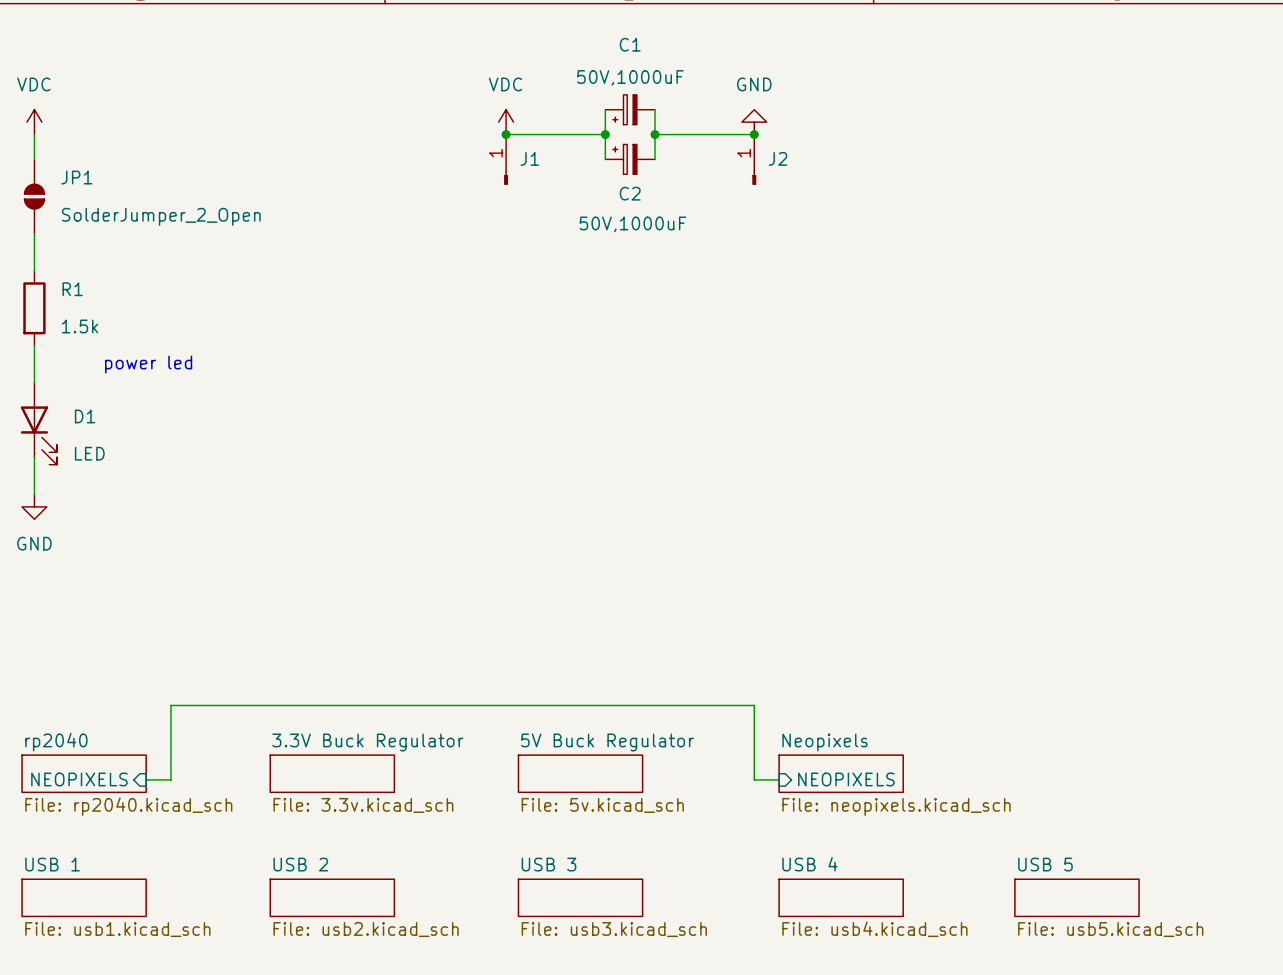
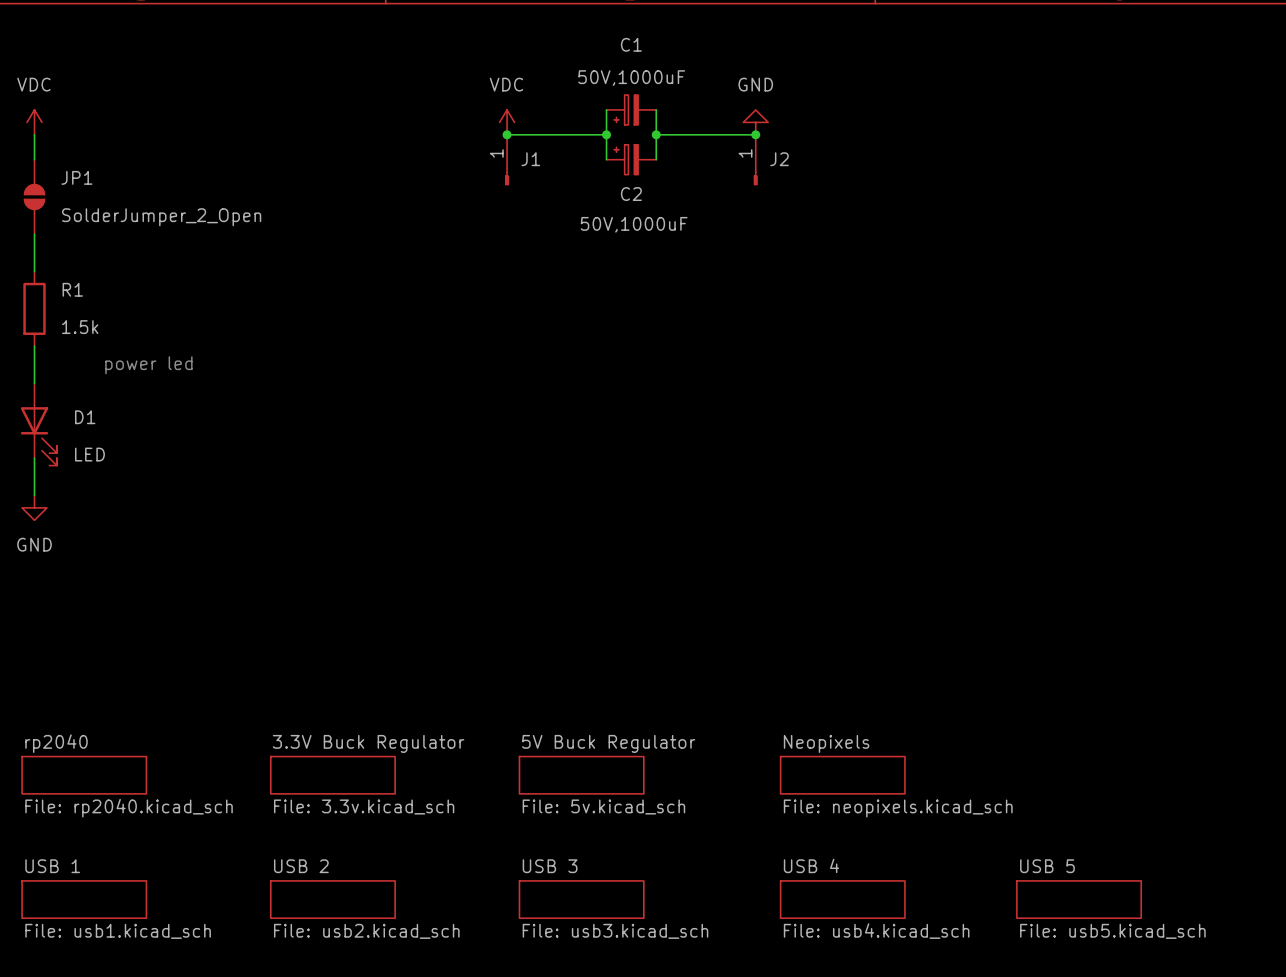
sheet pin: NEOPIXELS (79, 779) -> none
wire: (146, 779) (170, 779) (170, 705) (754, 705) (754, 779) (779, 779) -> none
sheet pin: NEOPIXELS (846, 779) -> none

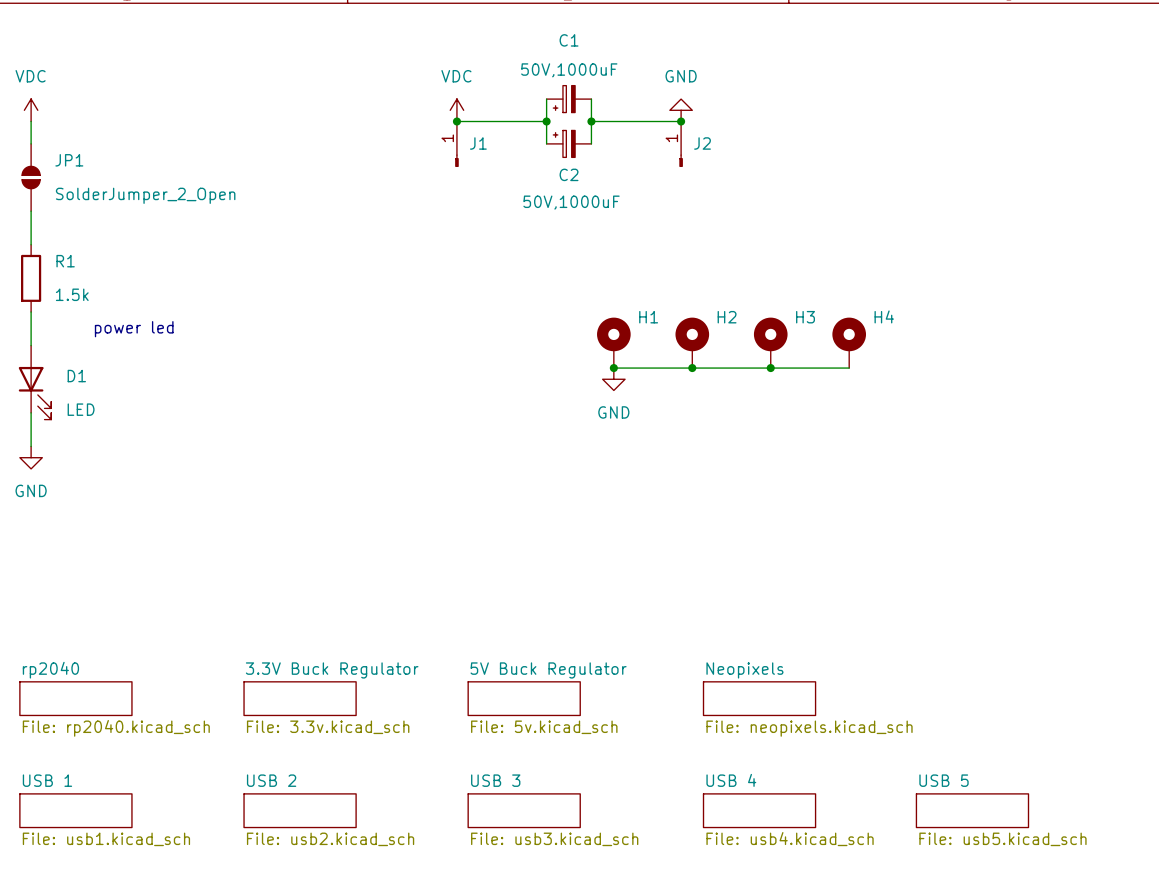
H1: none -> (613, 342)
H2: none -> (692, 342)
H3: none -> (770, 342)
H4: none -> (849, 342)
wire: none -> (613, 368) (849, 368)
junction: none -> (613, 368)
junction: none -> (692, 368)
junction: none -> (770, 368)
power symbol: none -> GND (613, 379)

